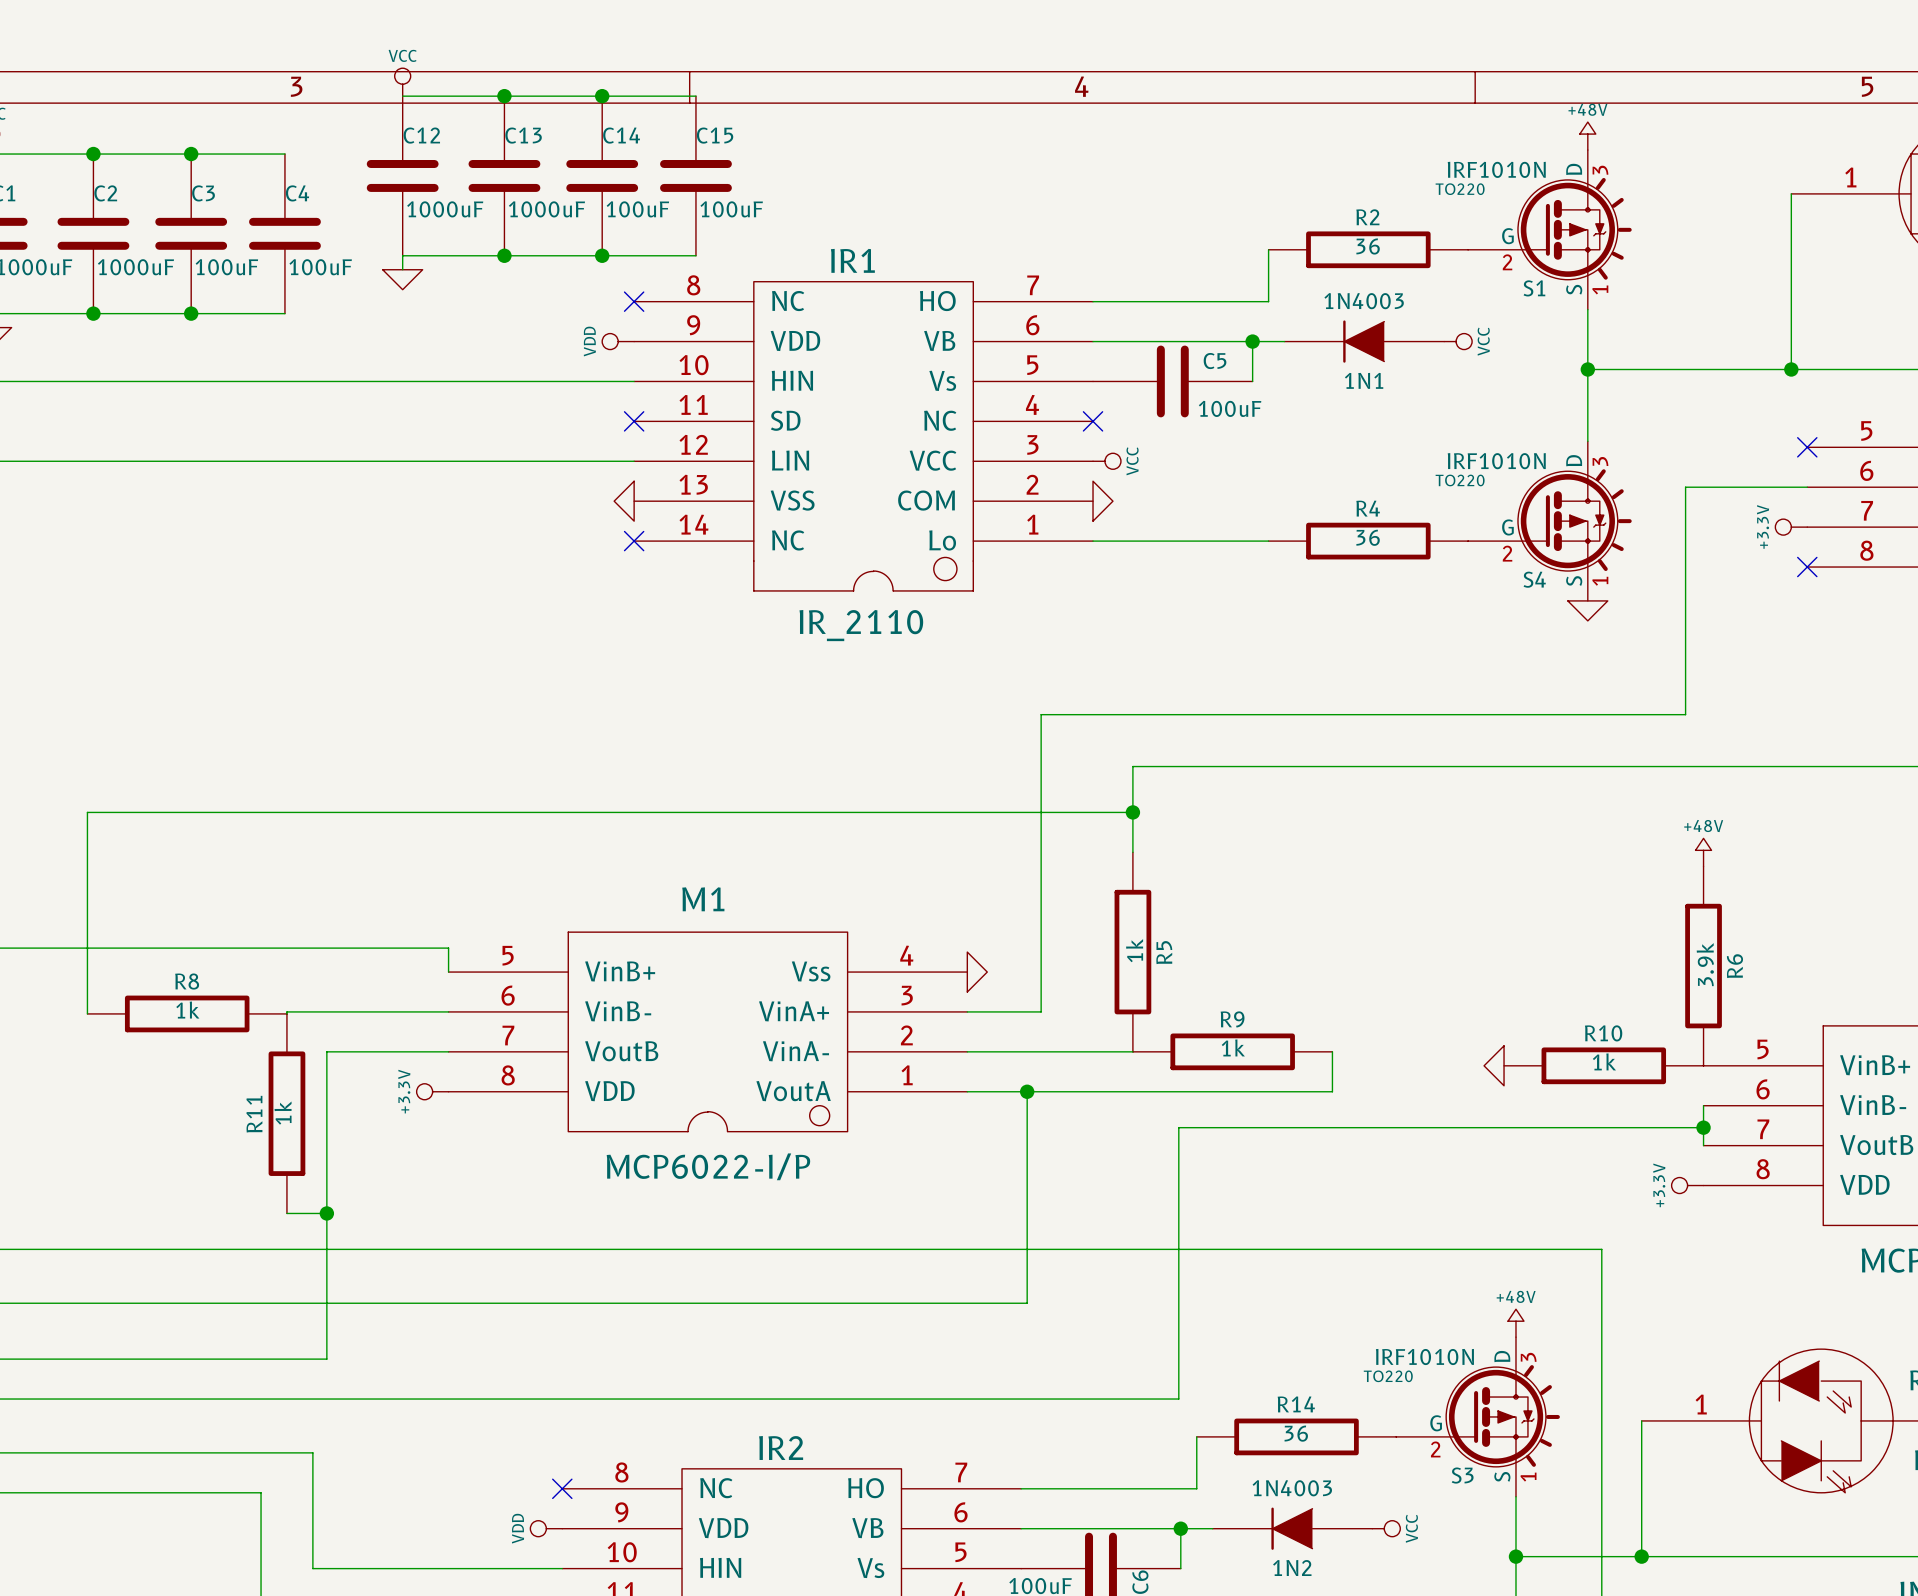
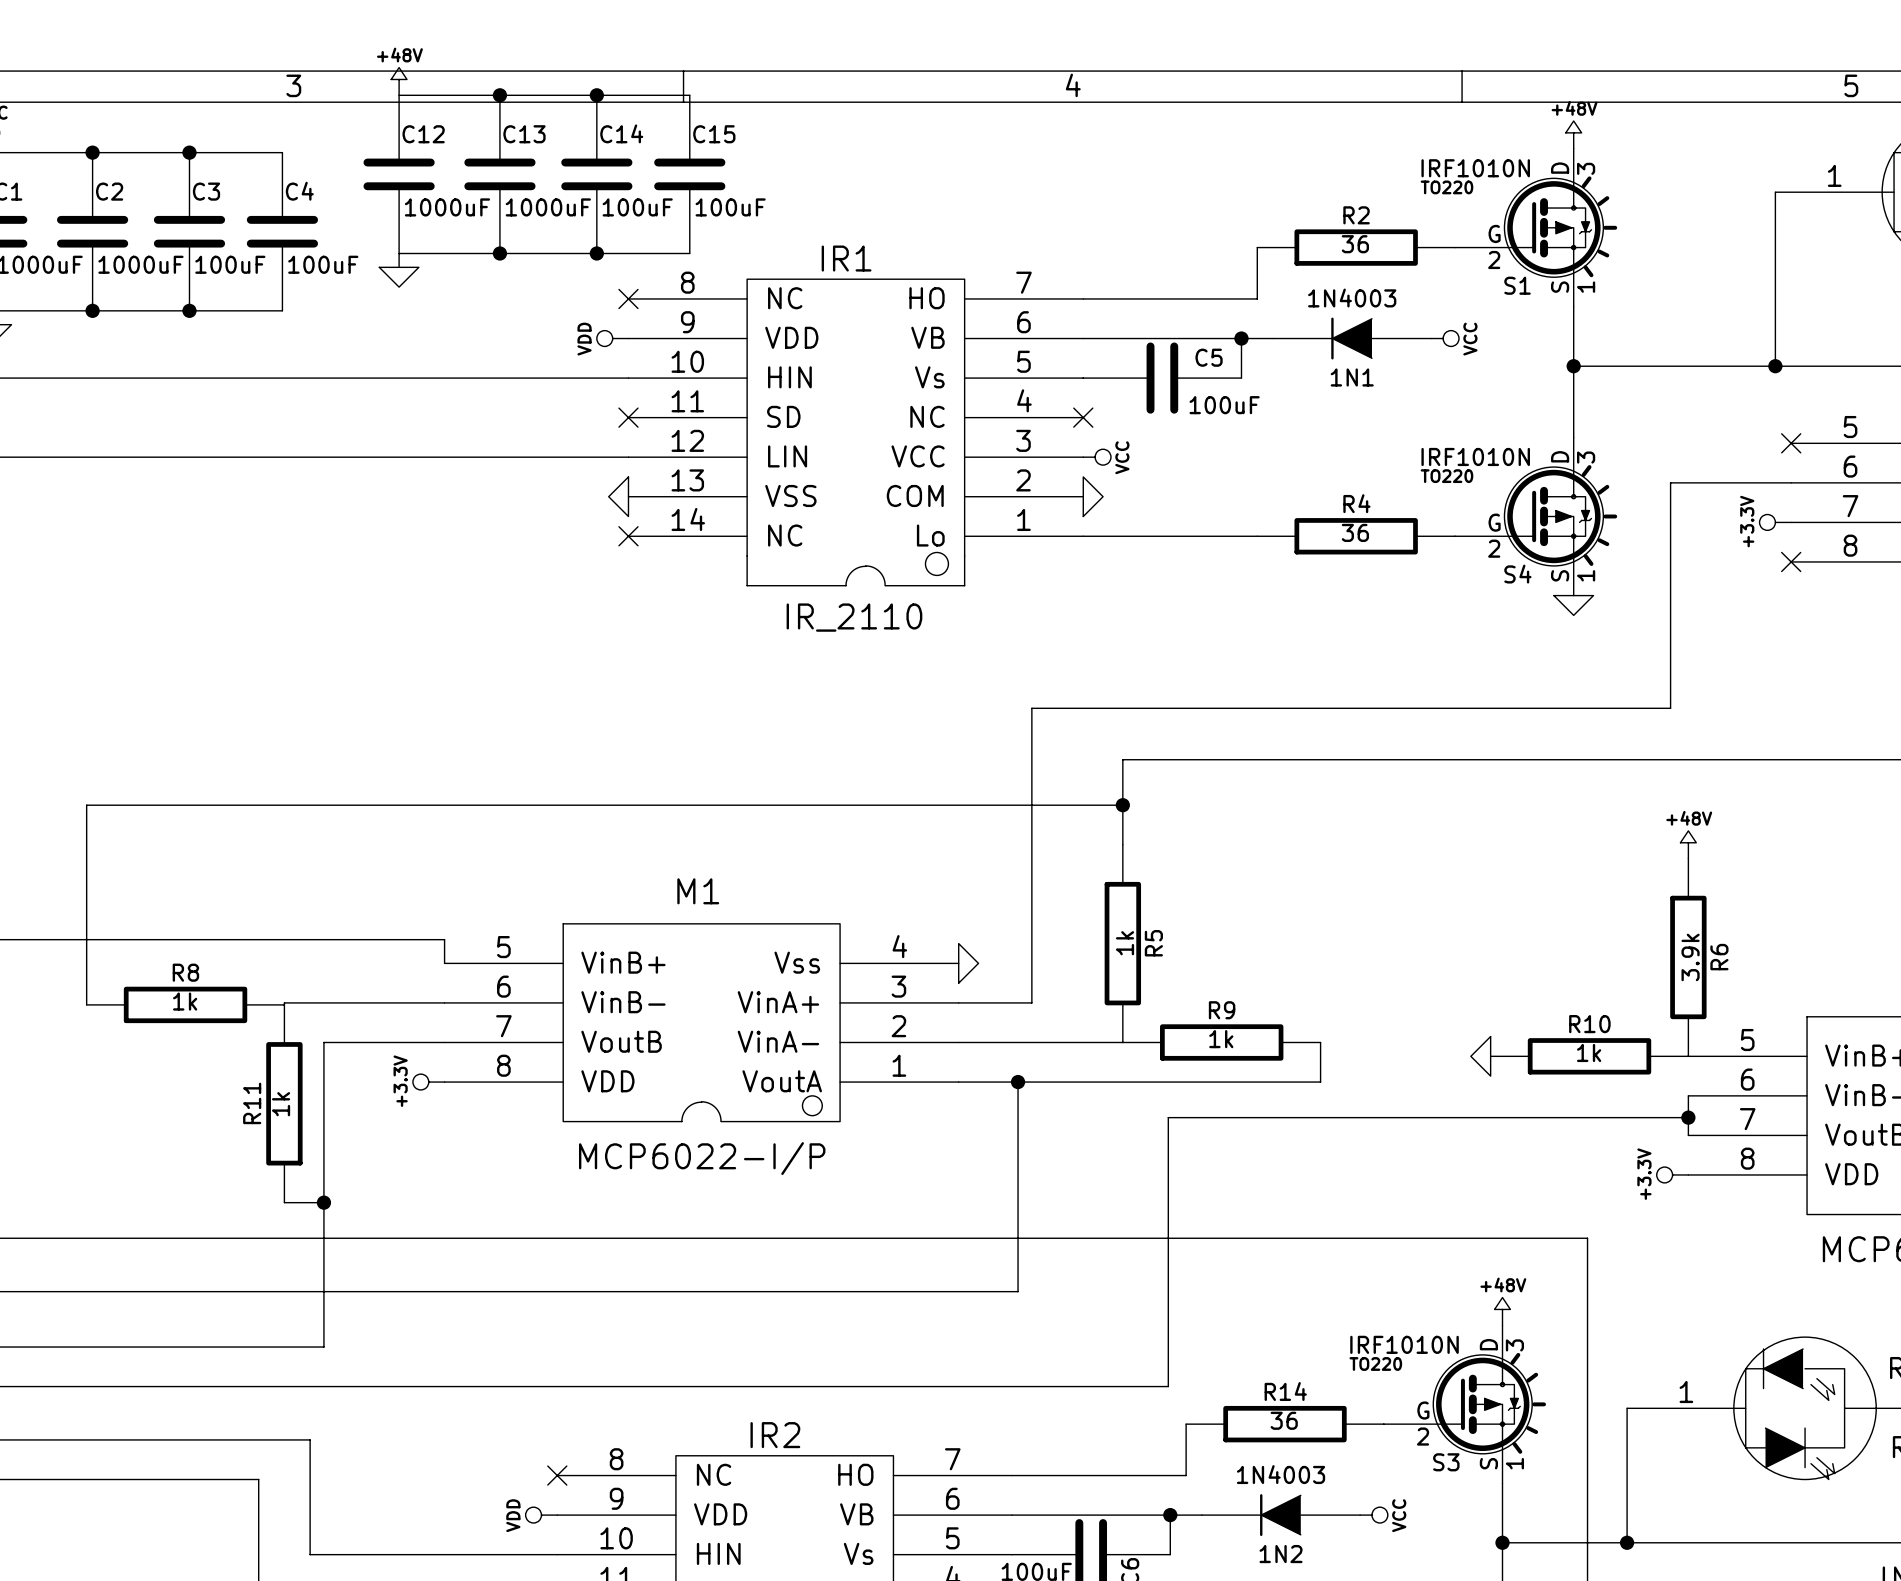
power symbol: VCC (402, 82) -> +48V (399, 81)

